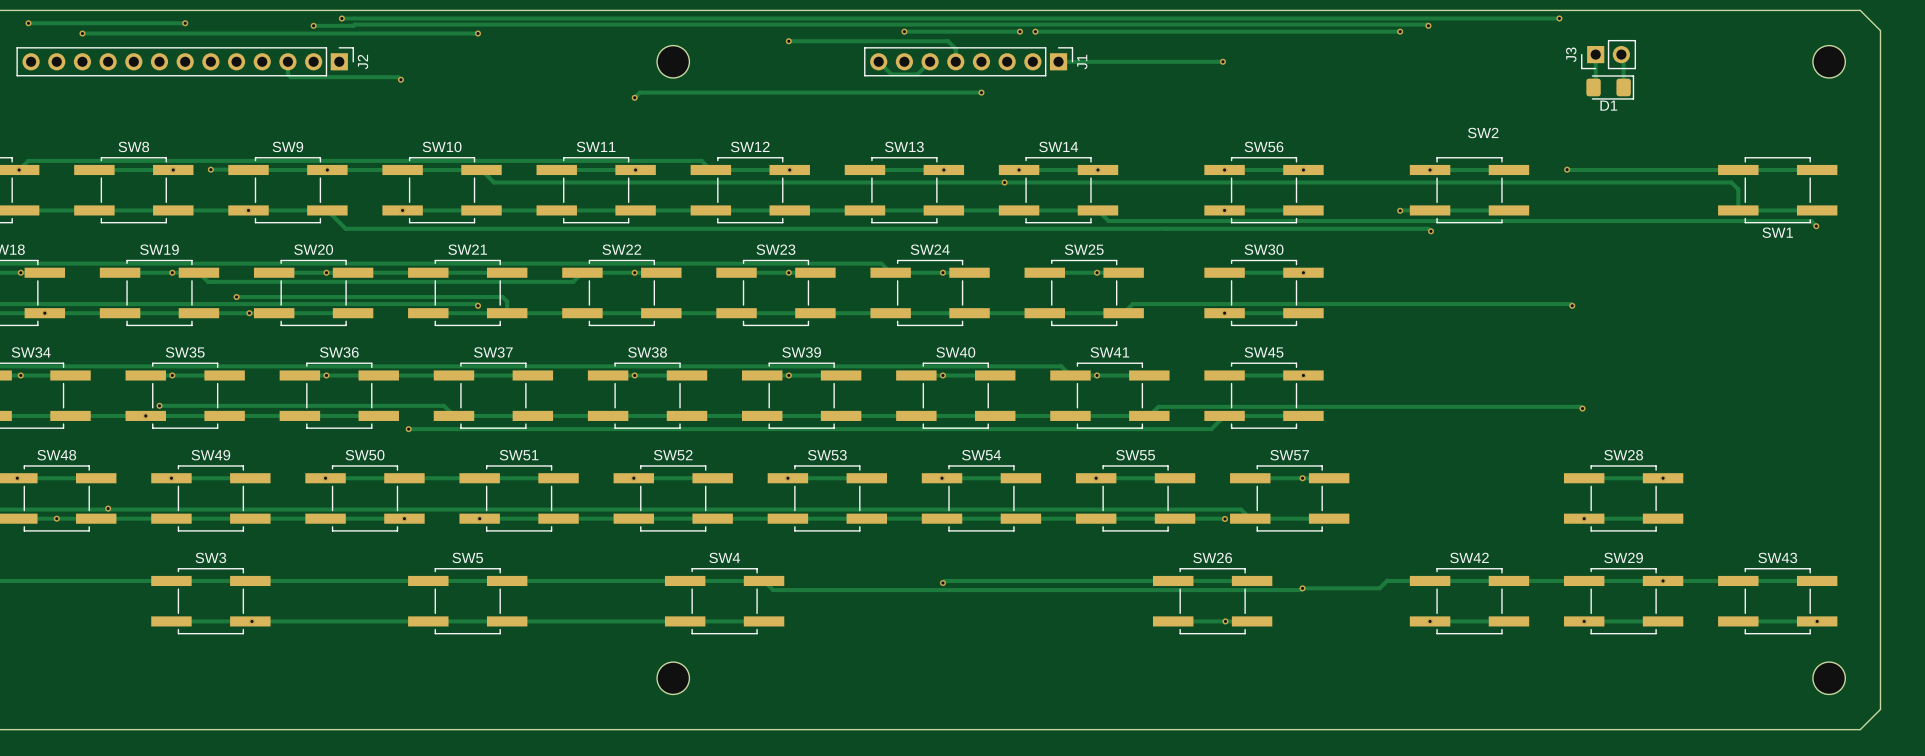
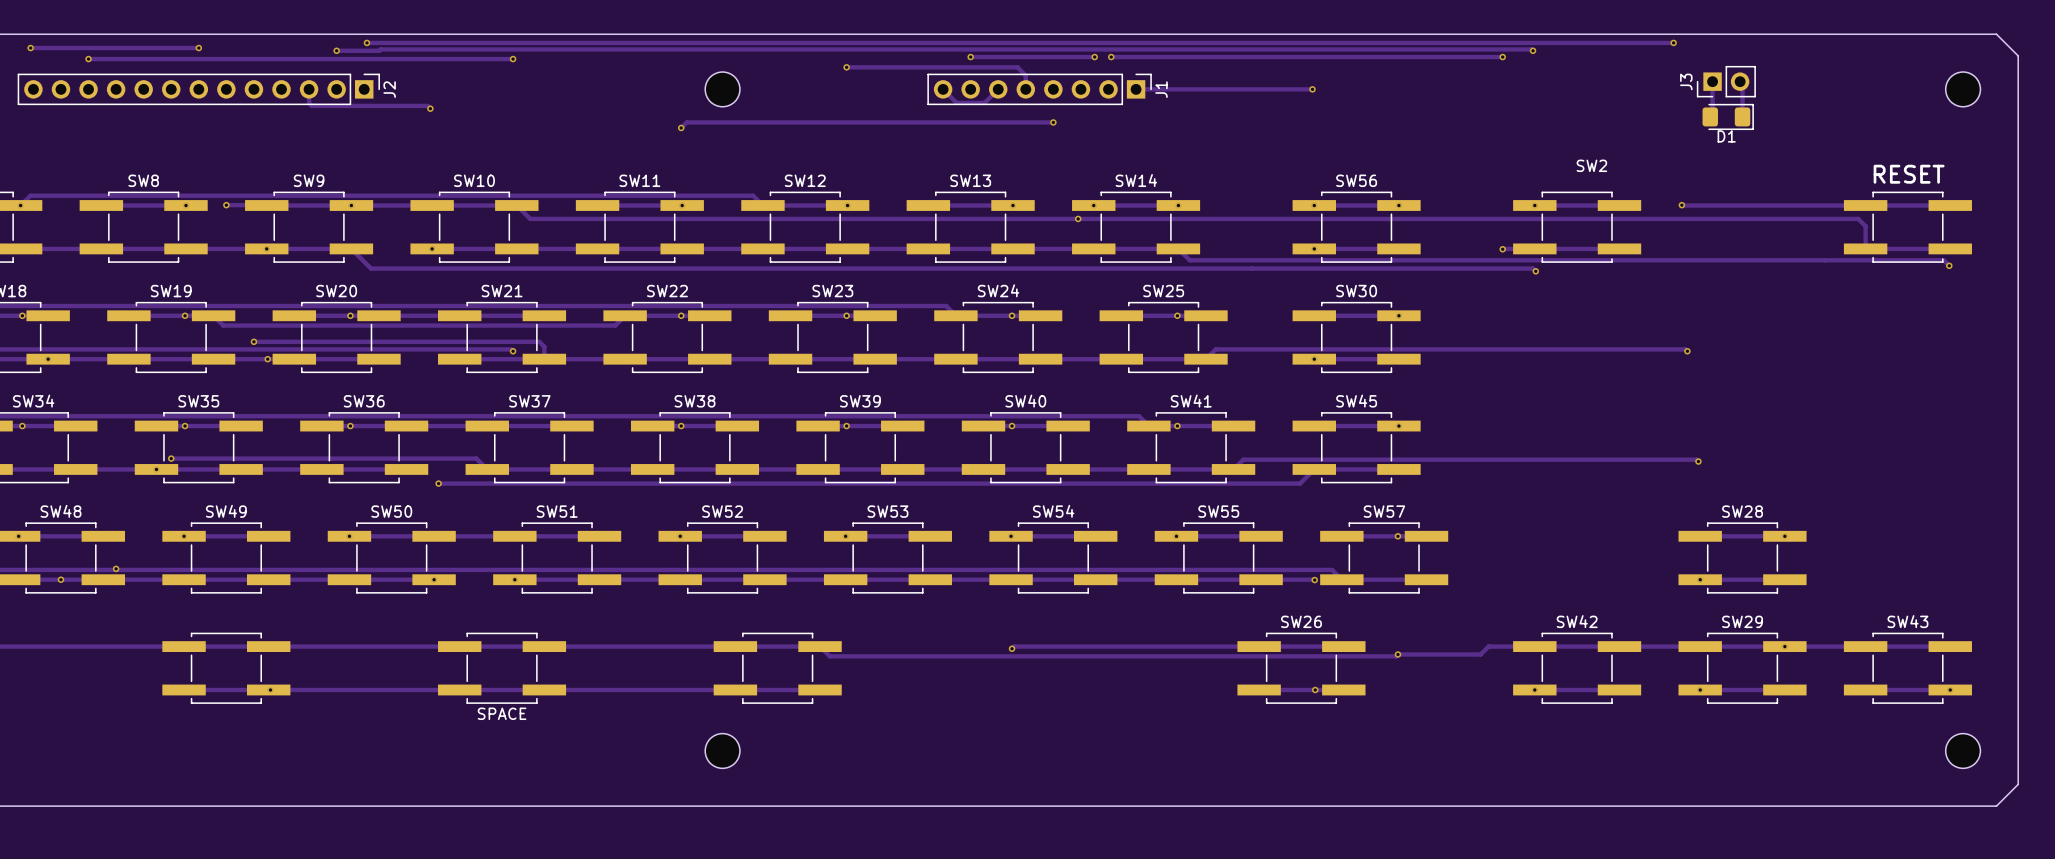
SW1 value: none -> RESET (1909, 174)
SW1 name: SW1 (1777, 232) -> none
SW3 name: SW3 (210, 557) -> none
SW5 name: SW5 (467, 557) -> none
SW4 name: SW4 (724, 557) -> none
SW5 value: none -> SPACE (502, 713)

